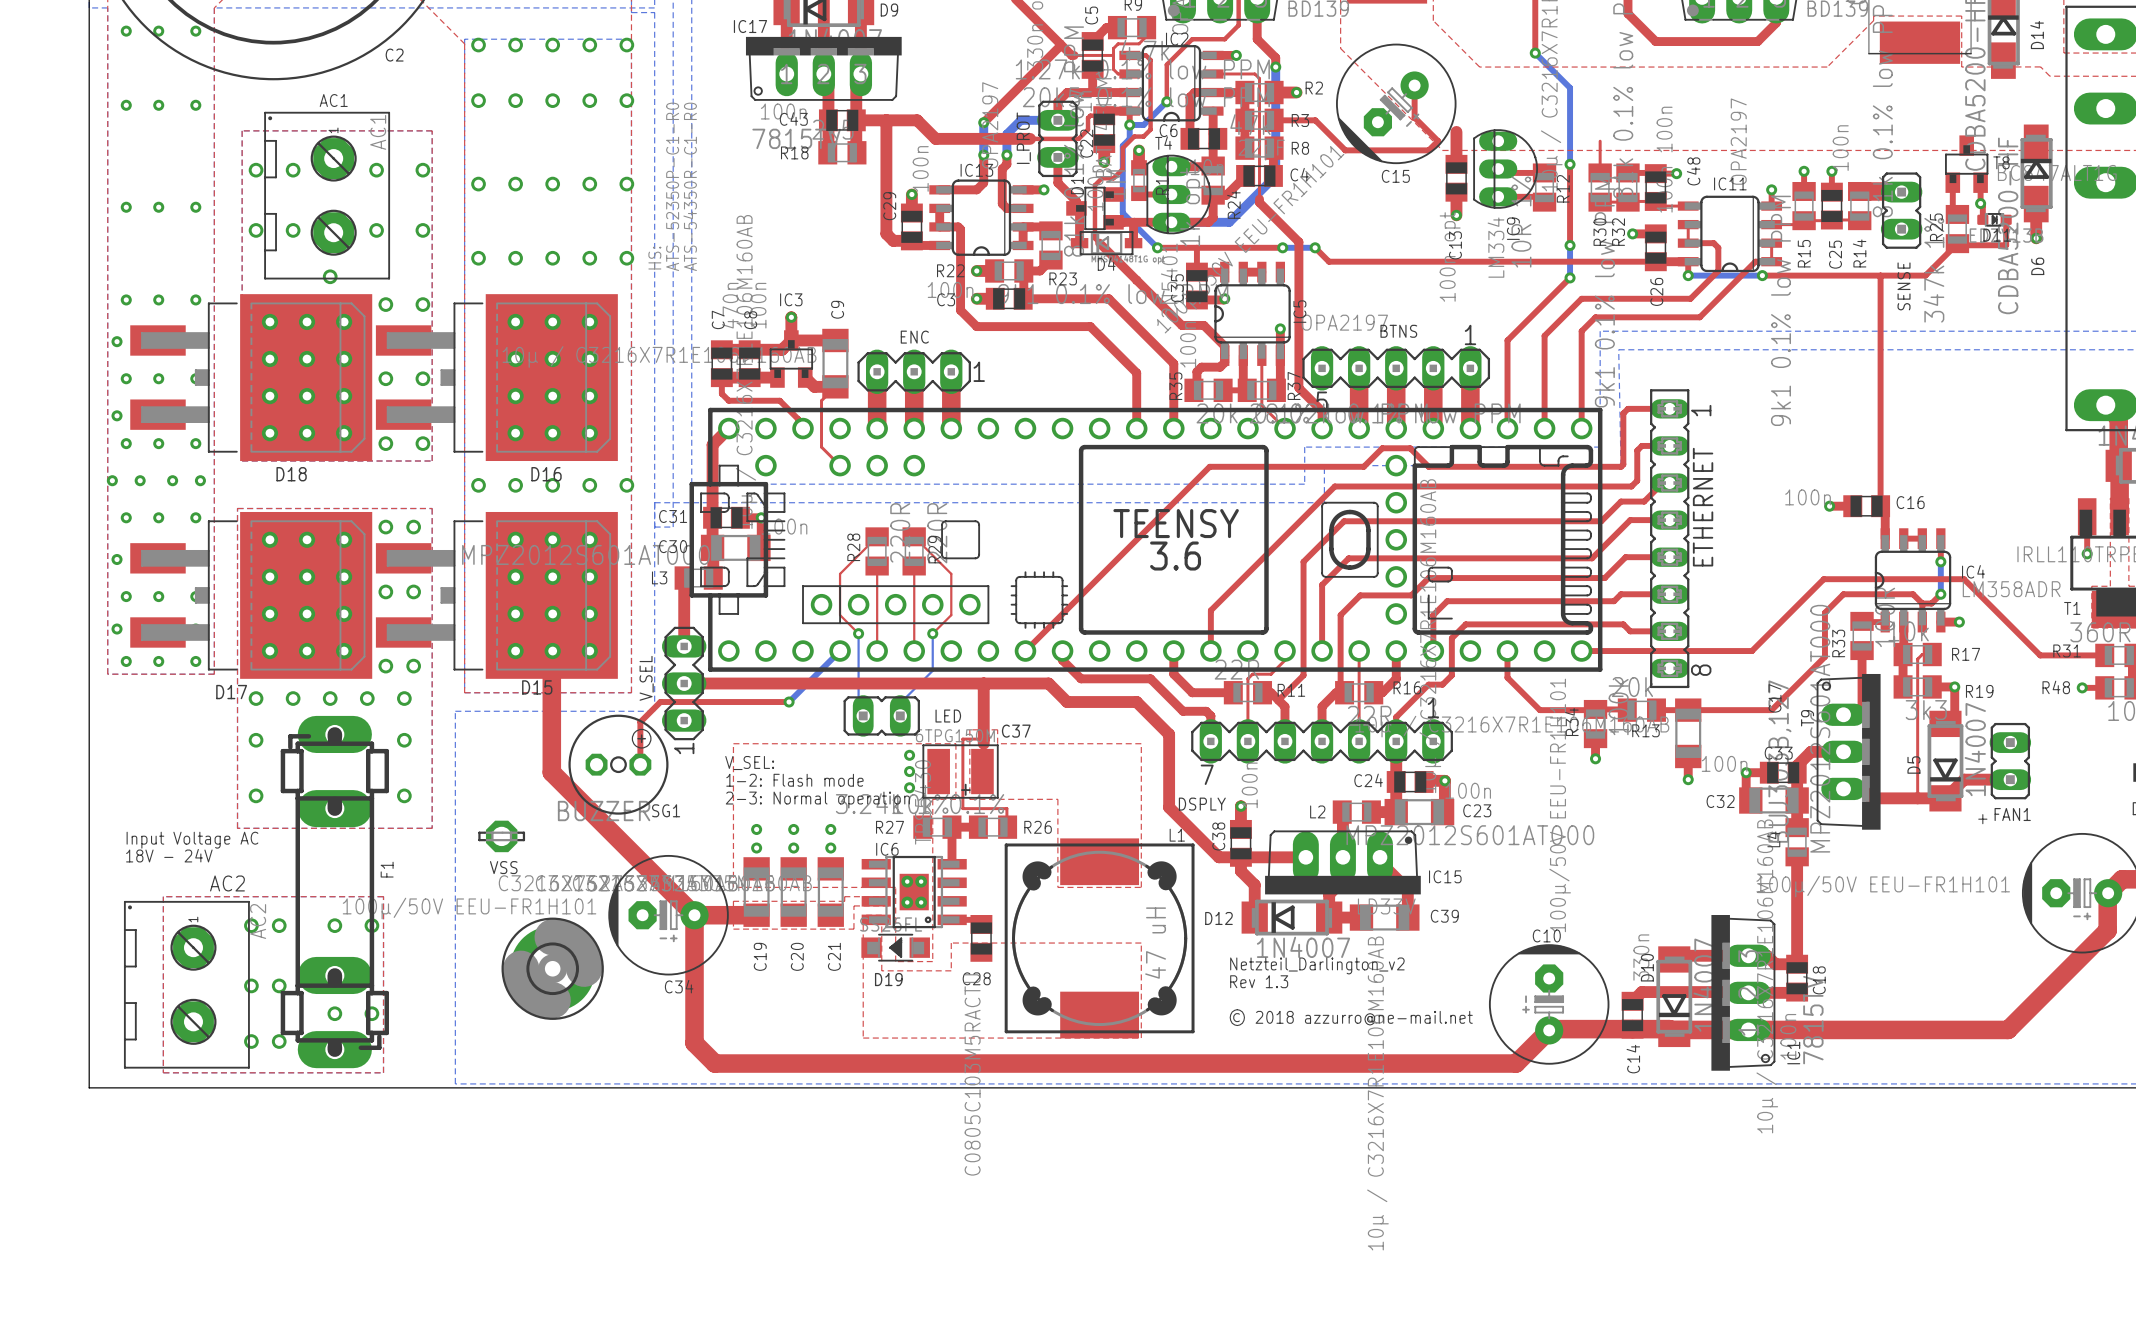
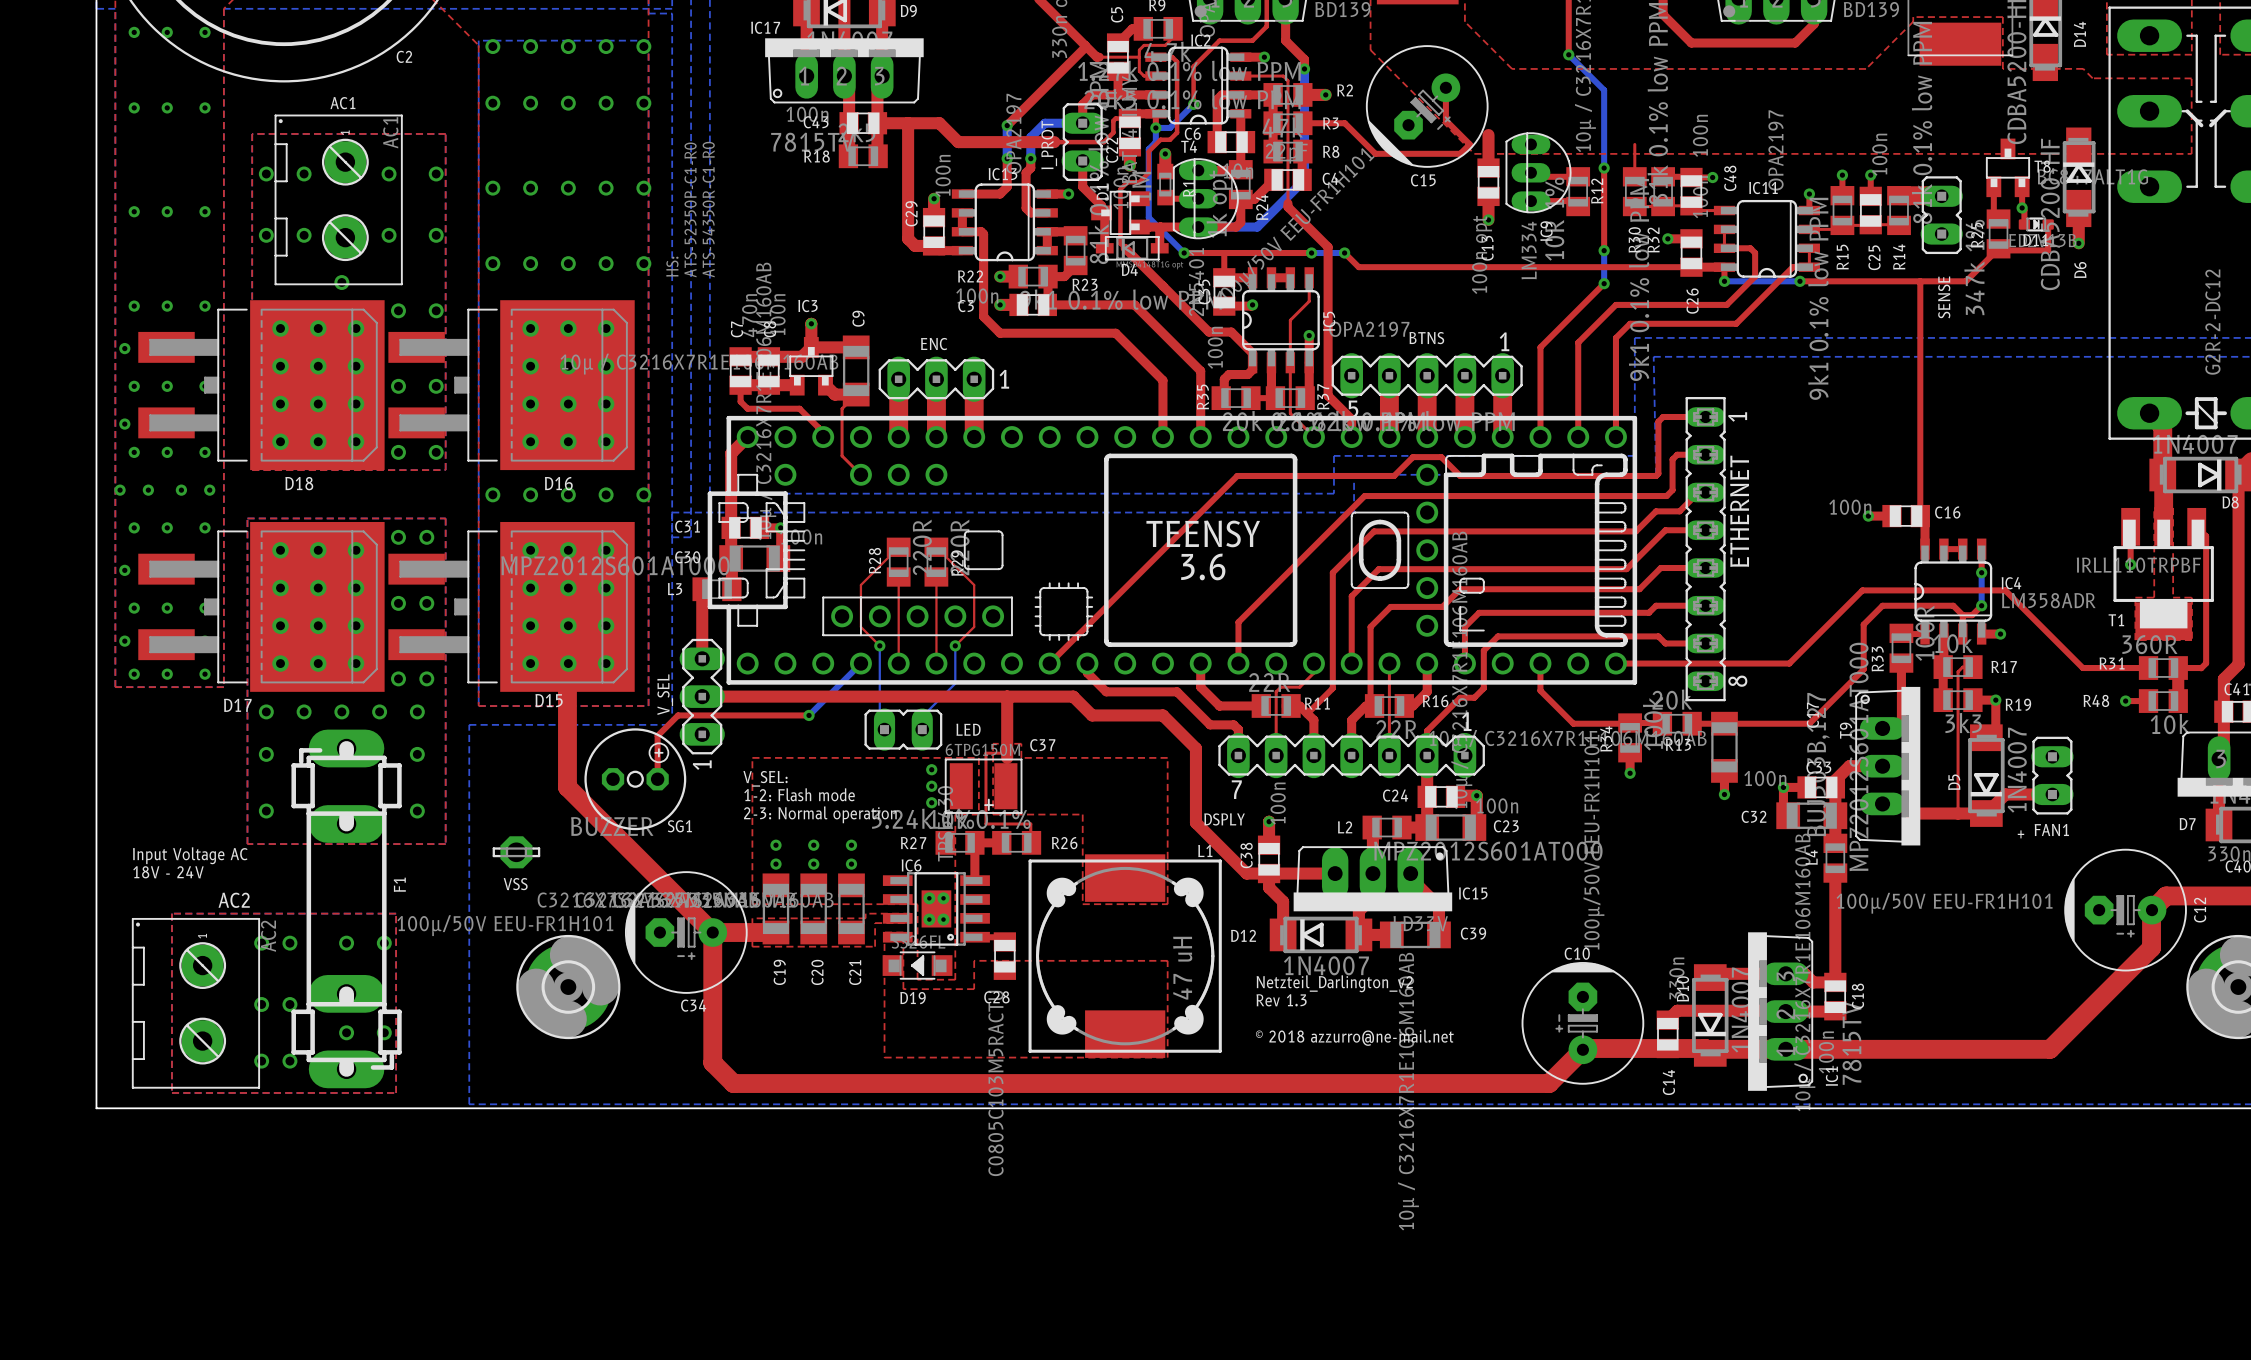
top track: none -> (1309, 277) (1309, 301) (1290, 320) (1290, 362)

